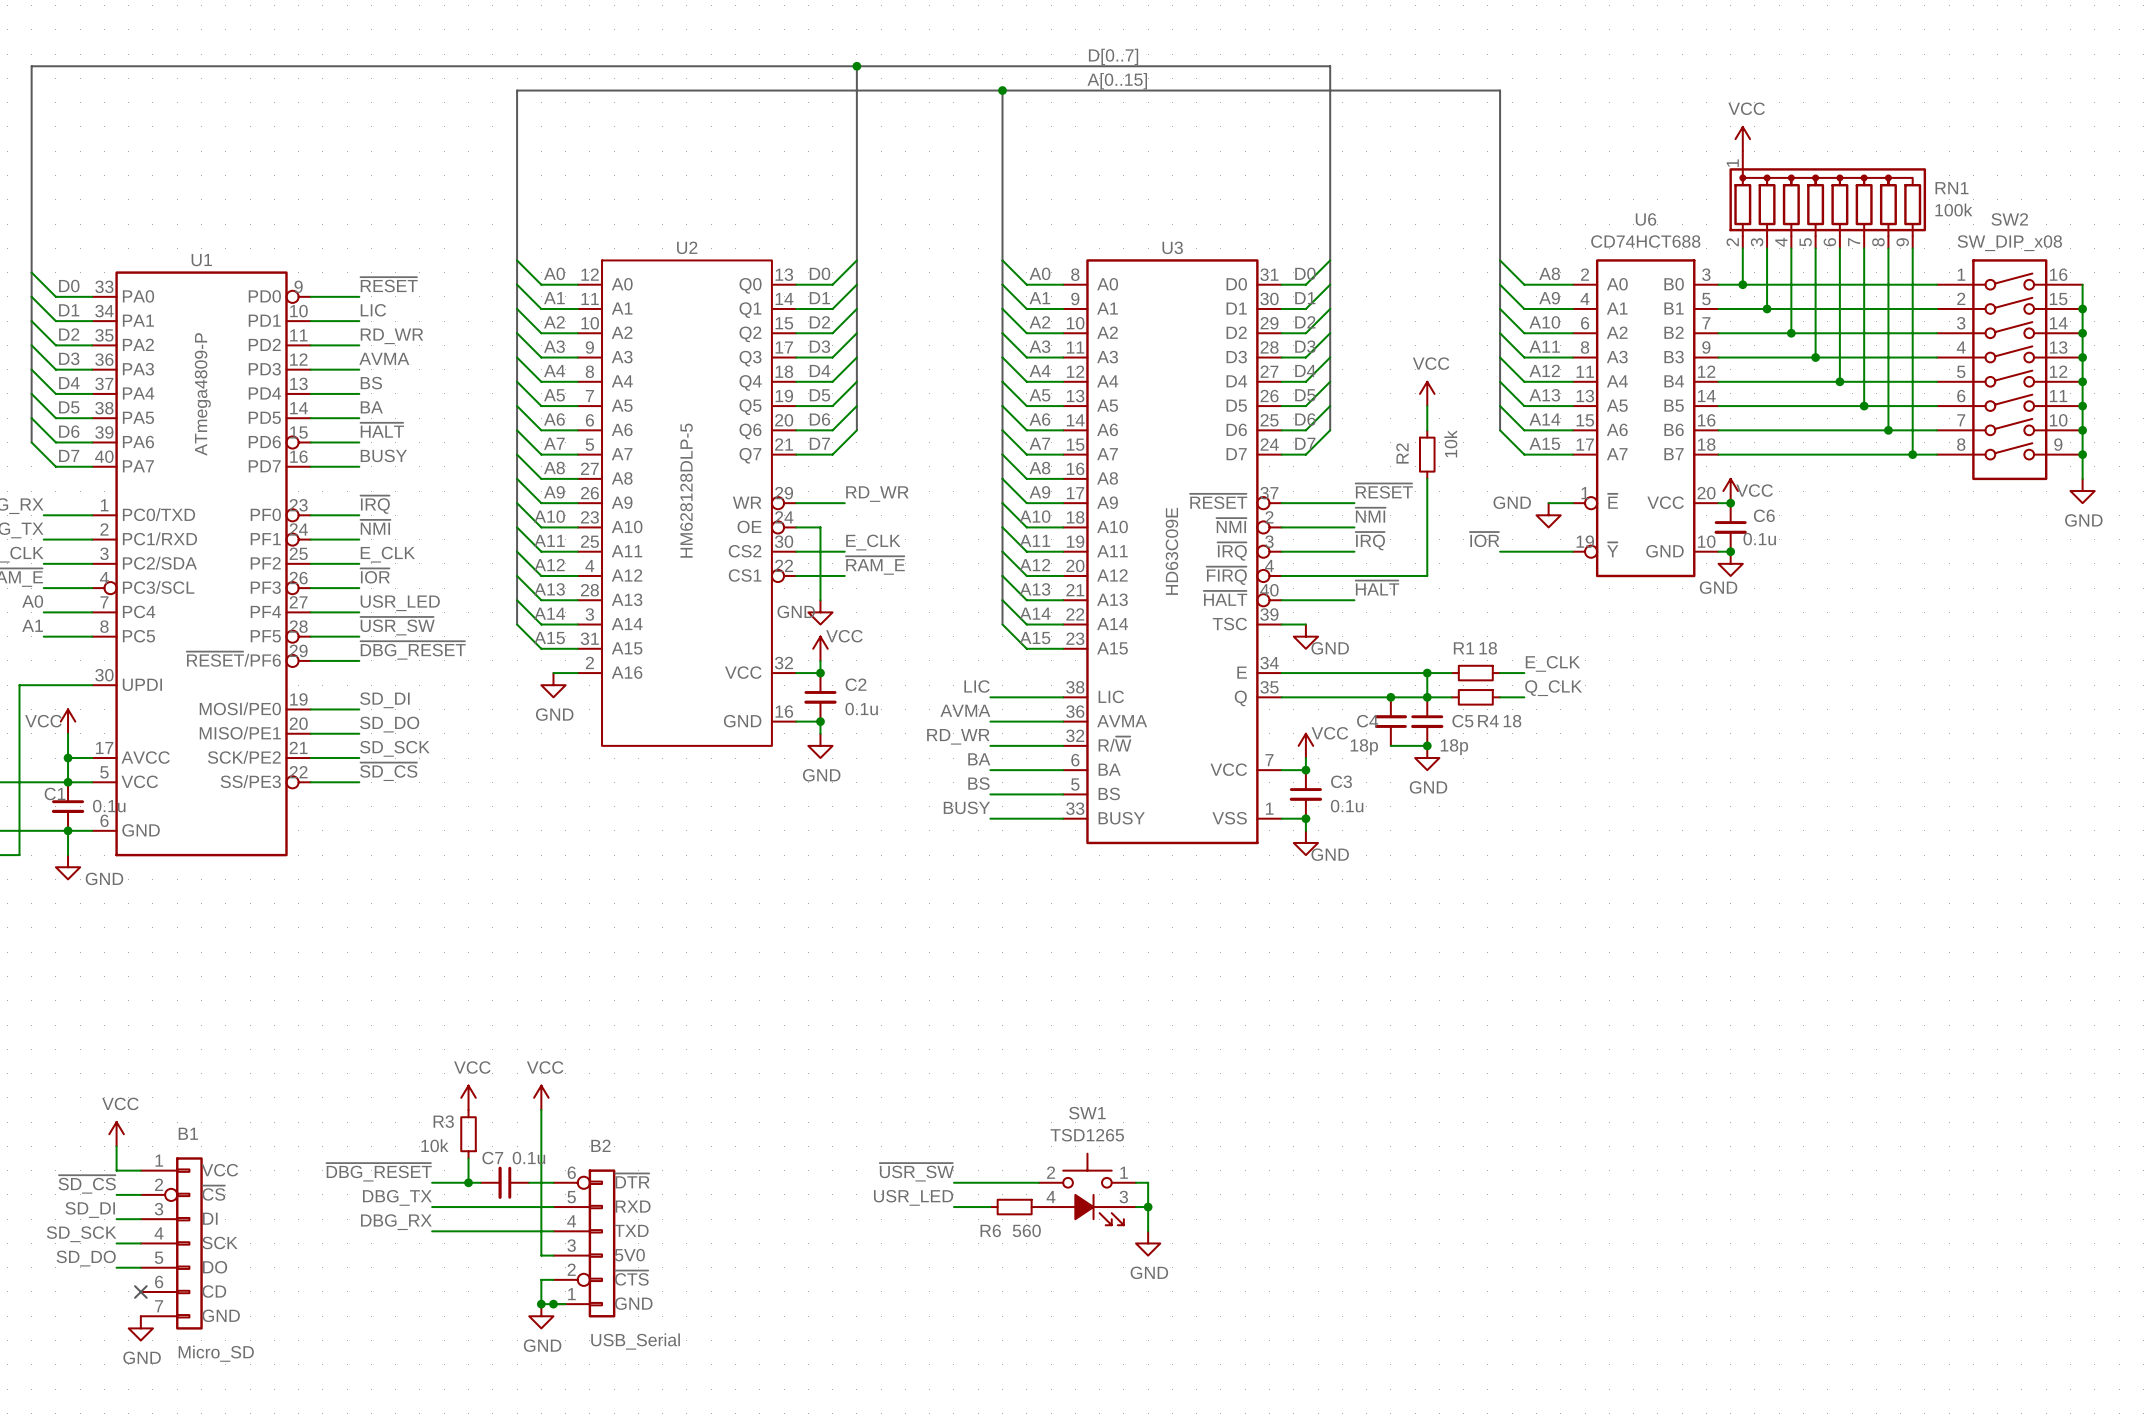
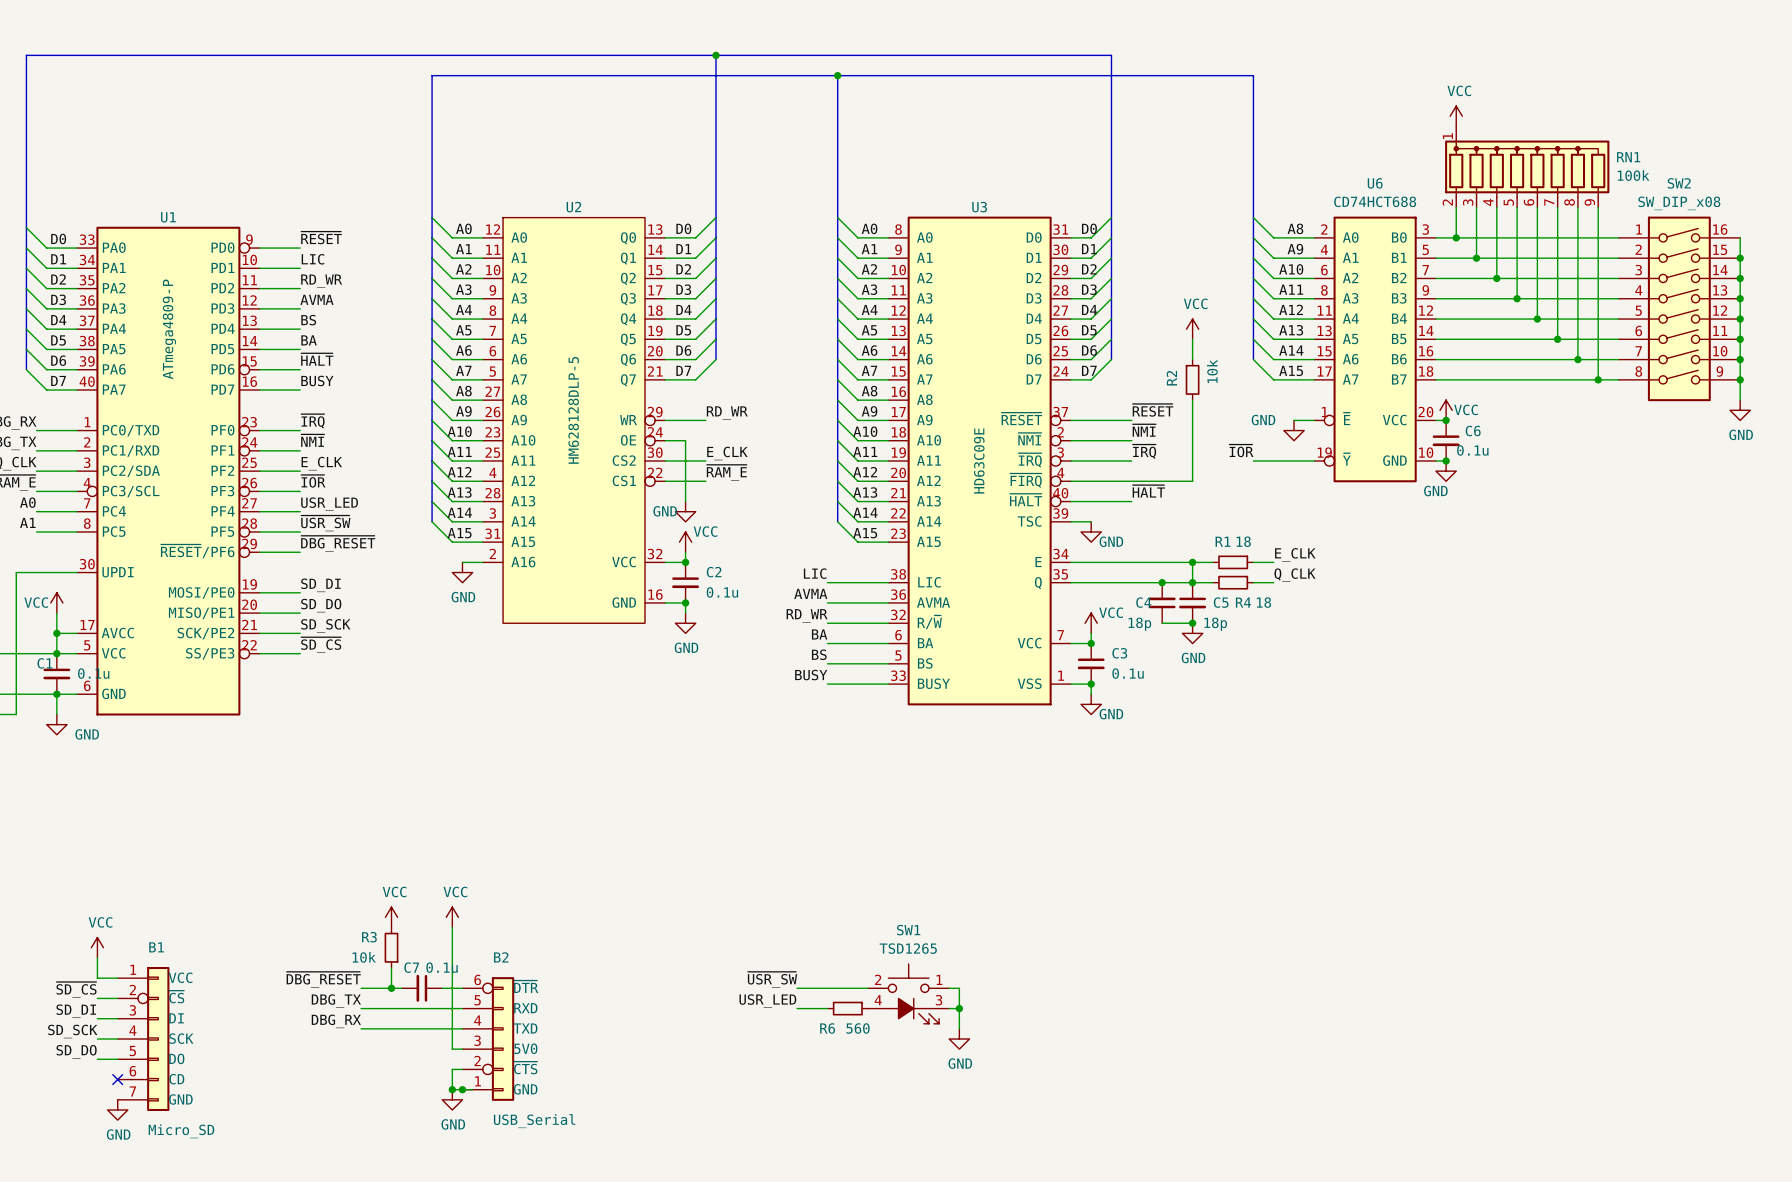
label: D[0..7] (1113, 56) -> none
label: A[0..15] (1117, 81) -> none

